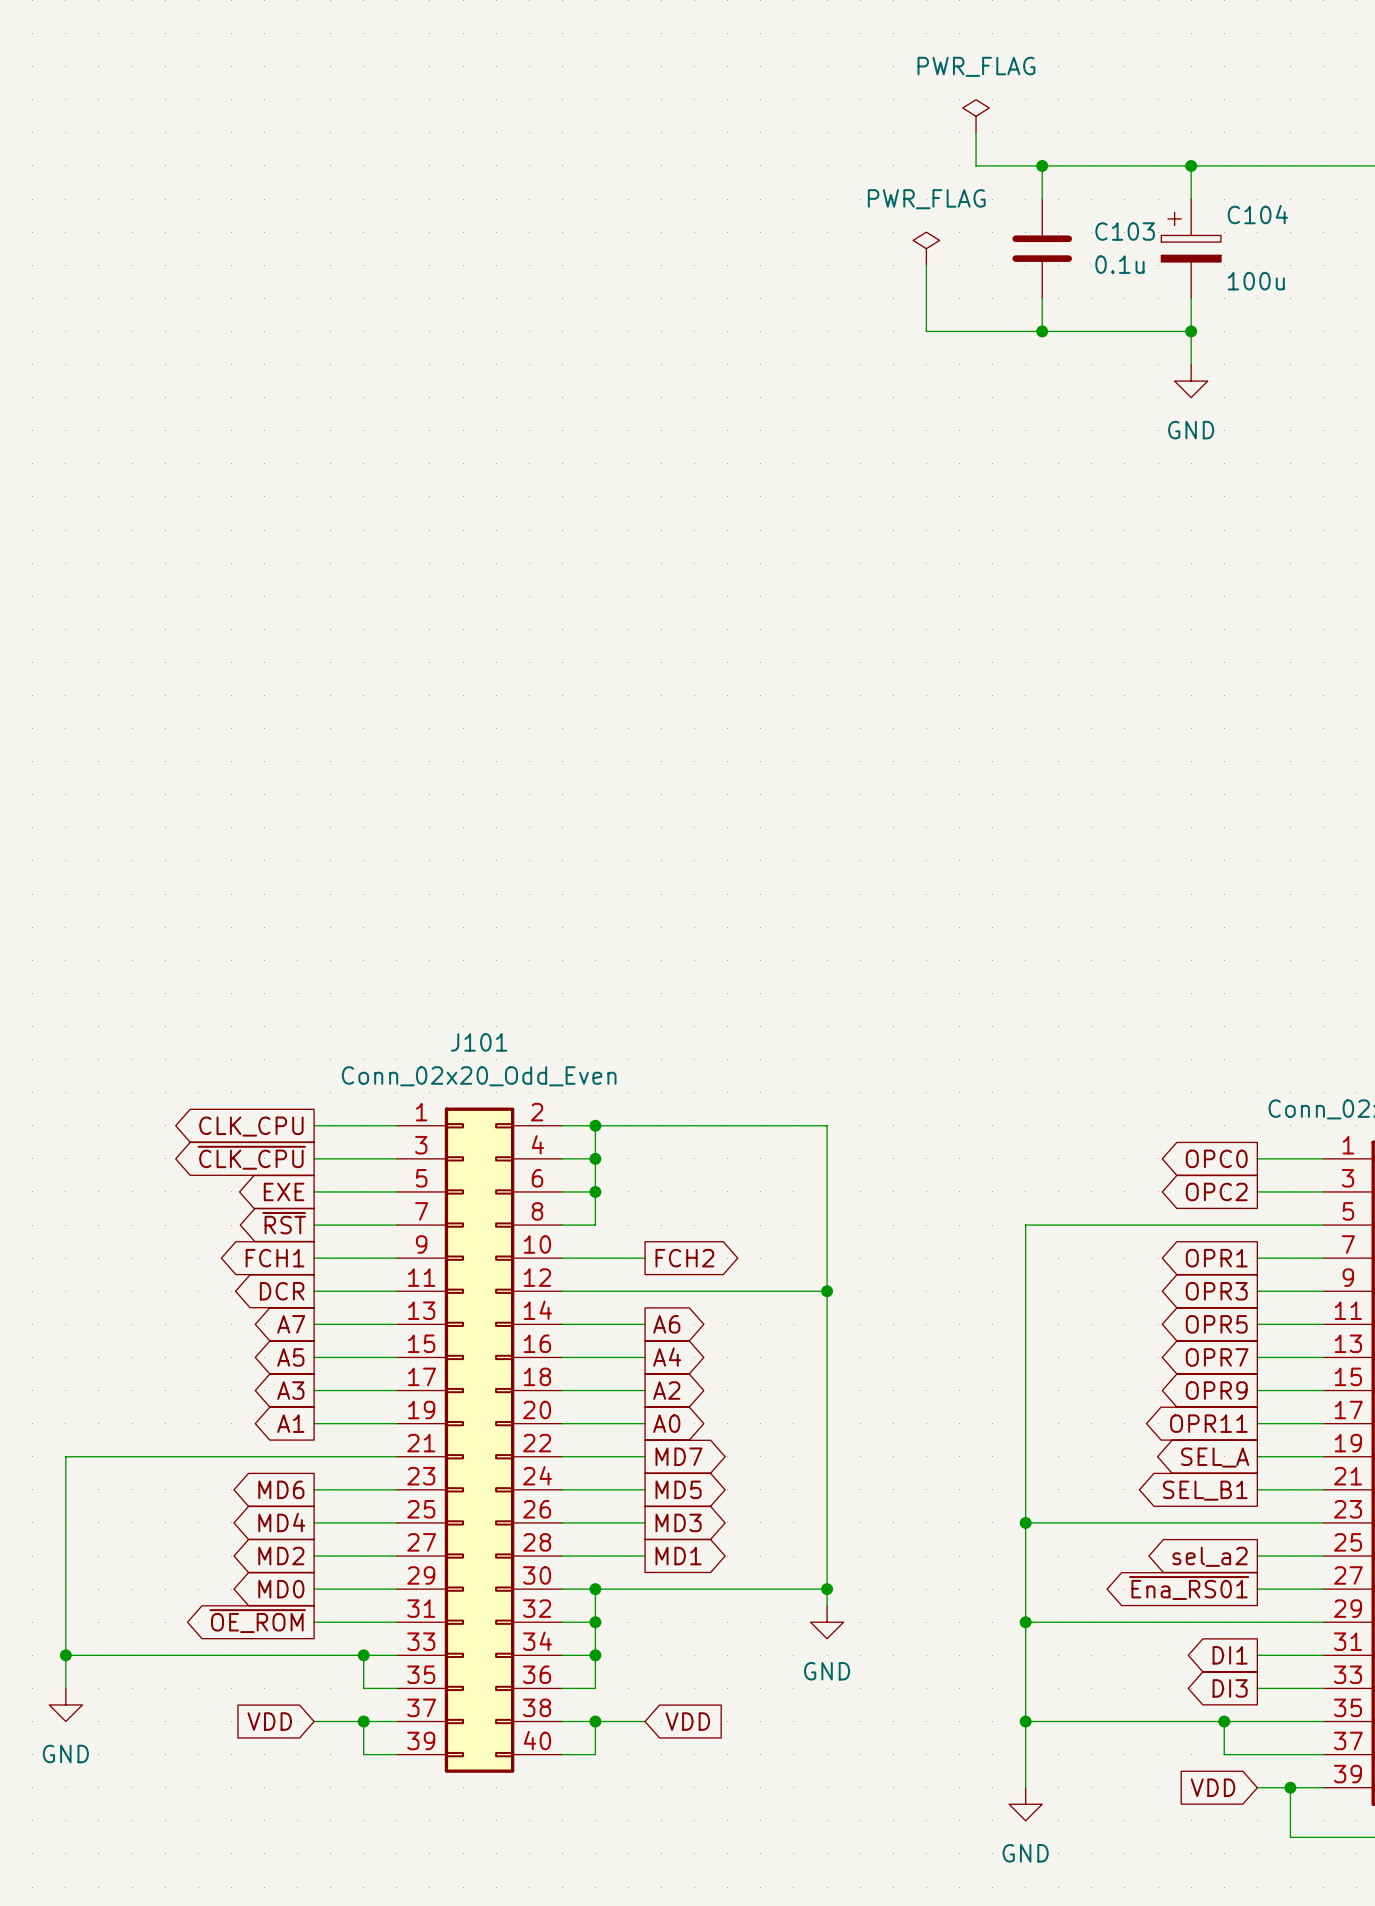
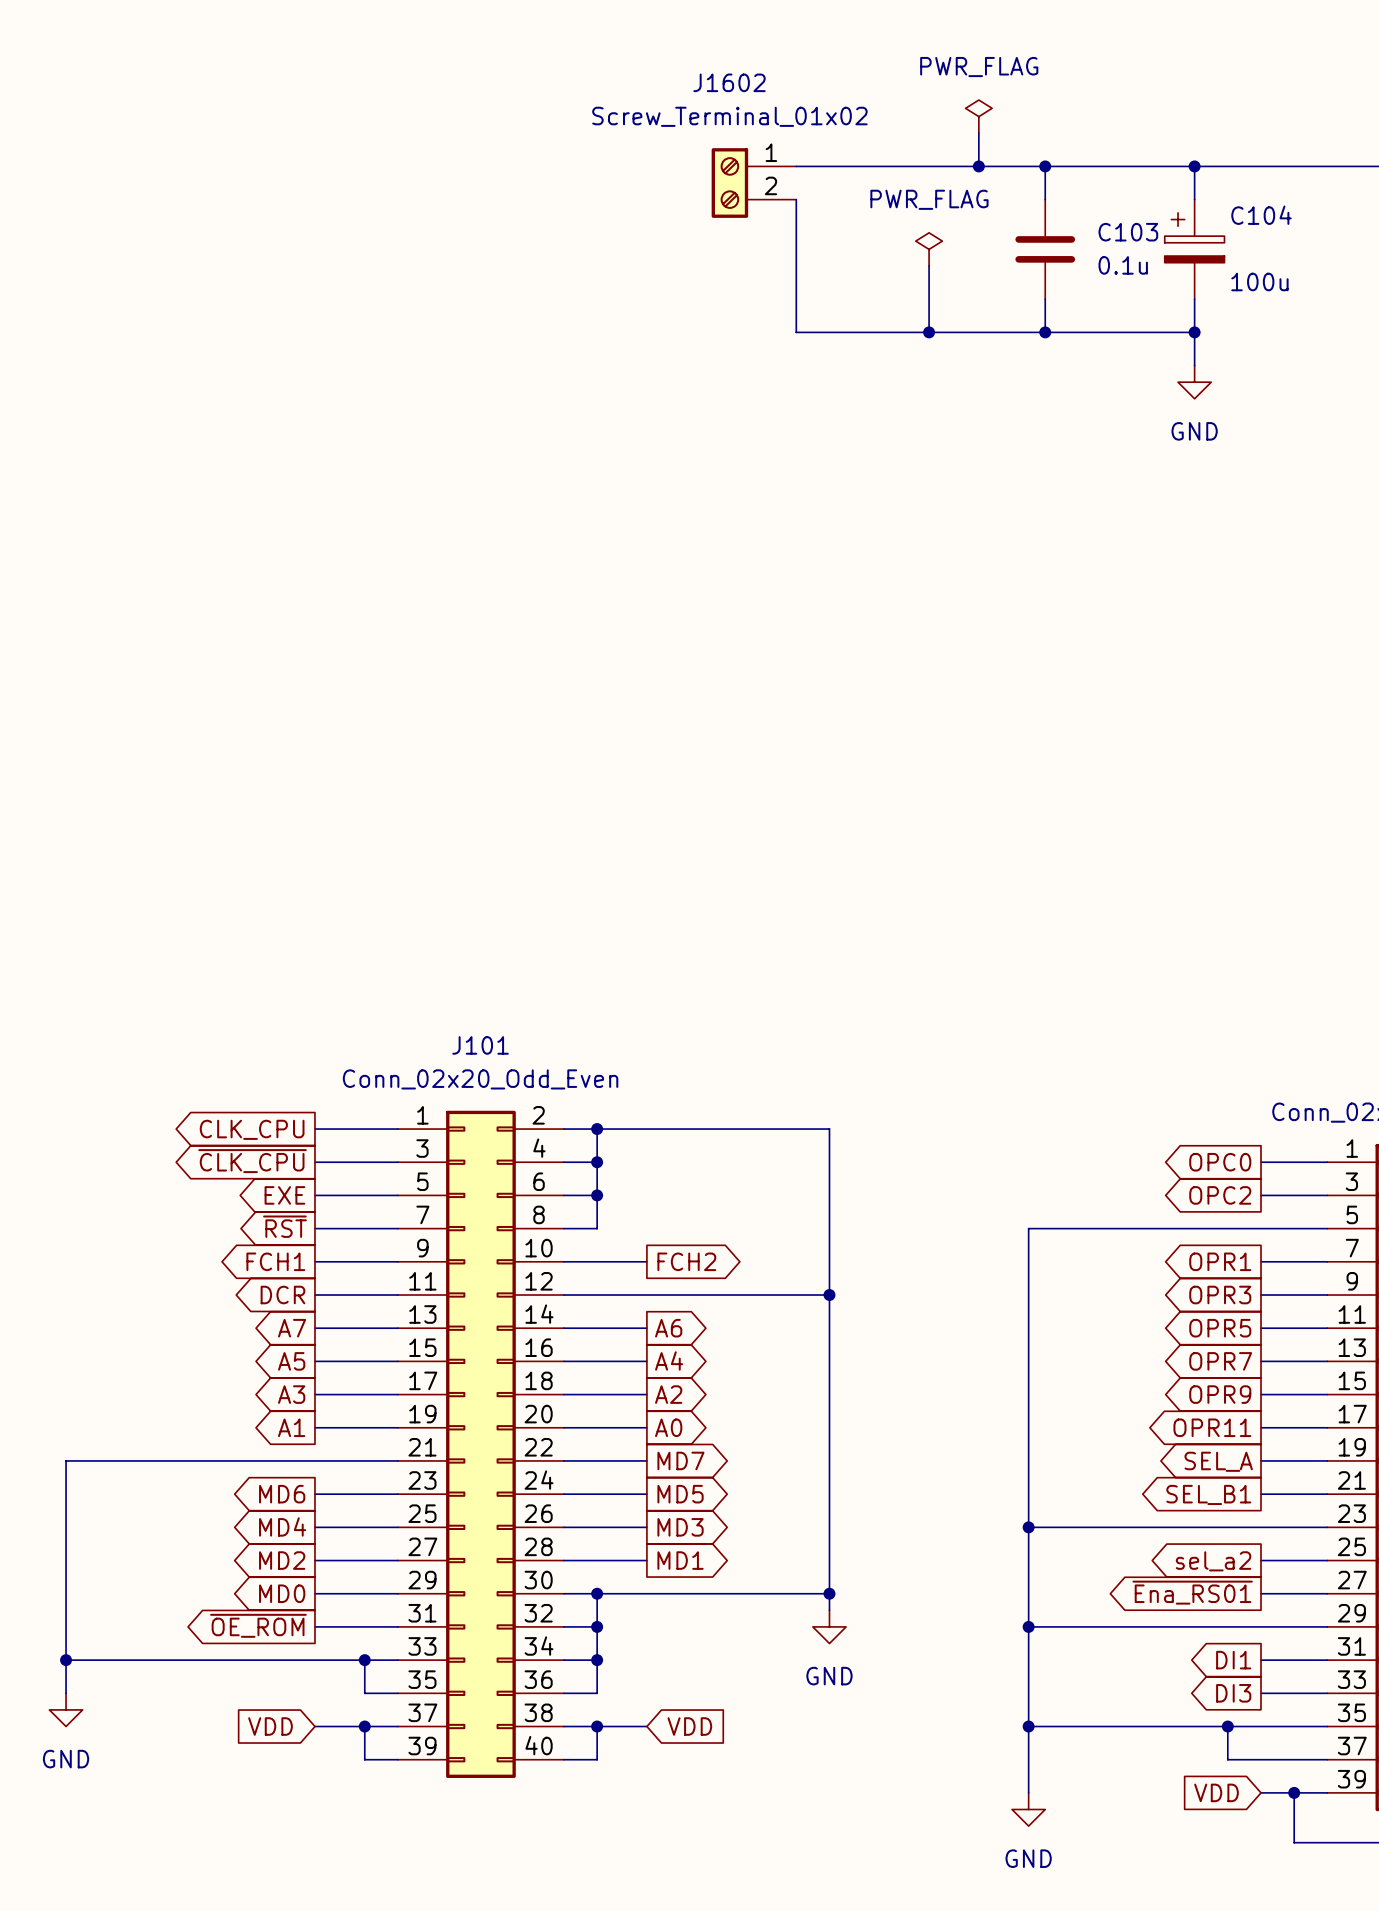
wire: none -> (796, 166) (978, 166)
junction: none -> (978, 166)
J1602: none -> Screw_Terminal_01x02 (753, 183)
wire: none -> (796, 199) (796, 332) (929, 332)
junction: none -> (929, 332)

